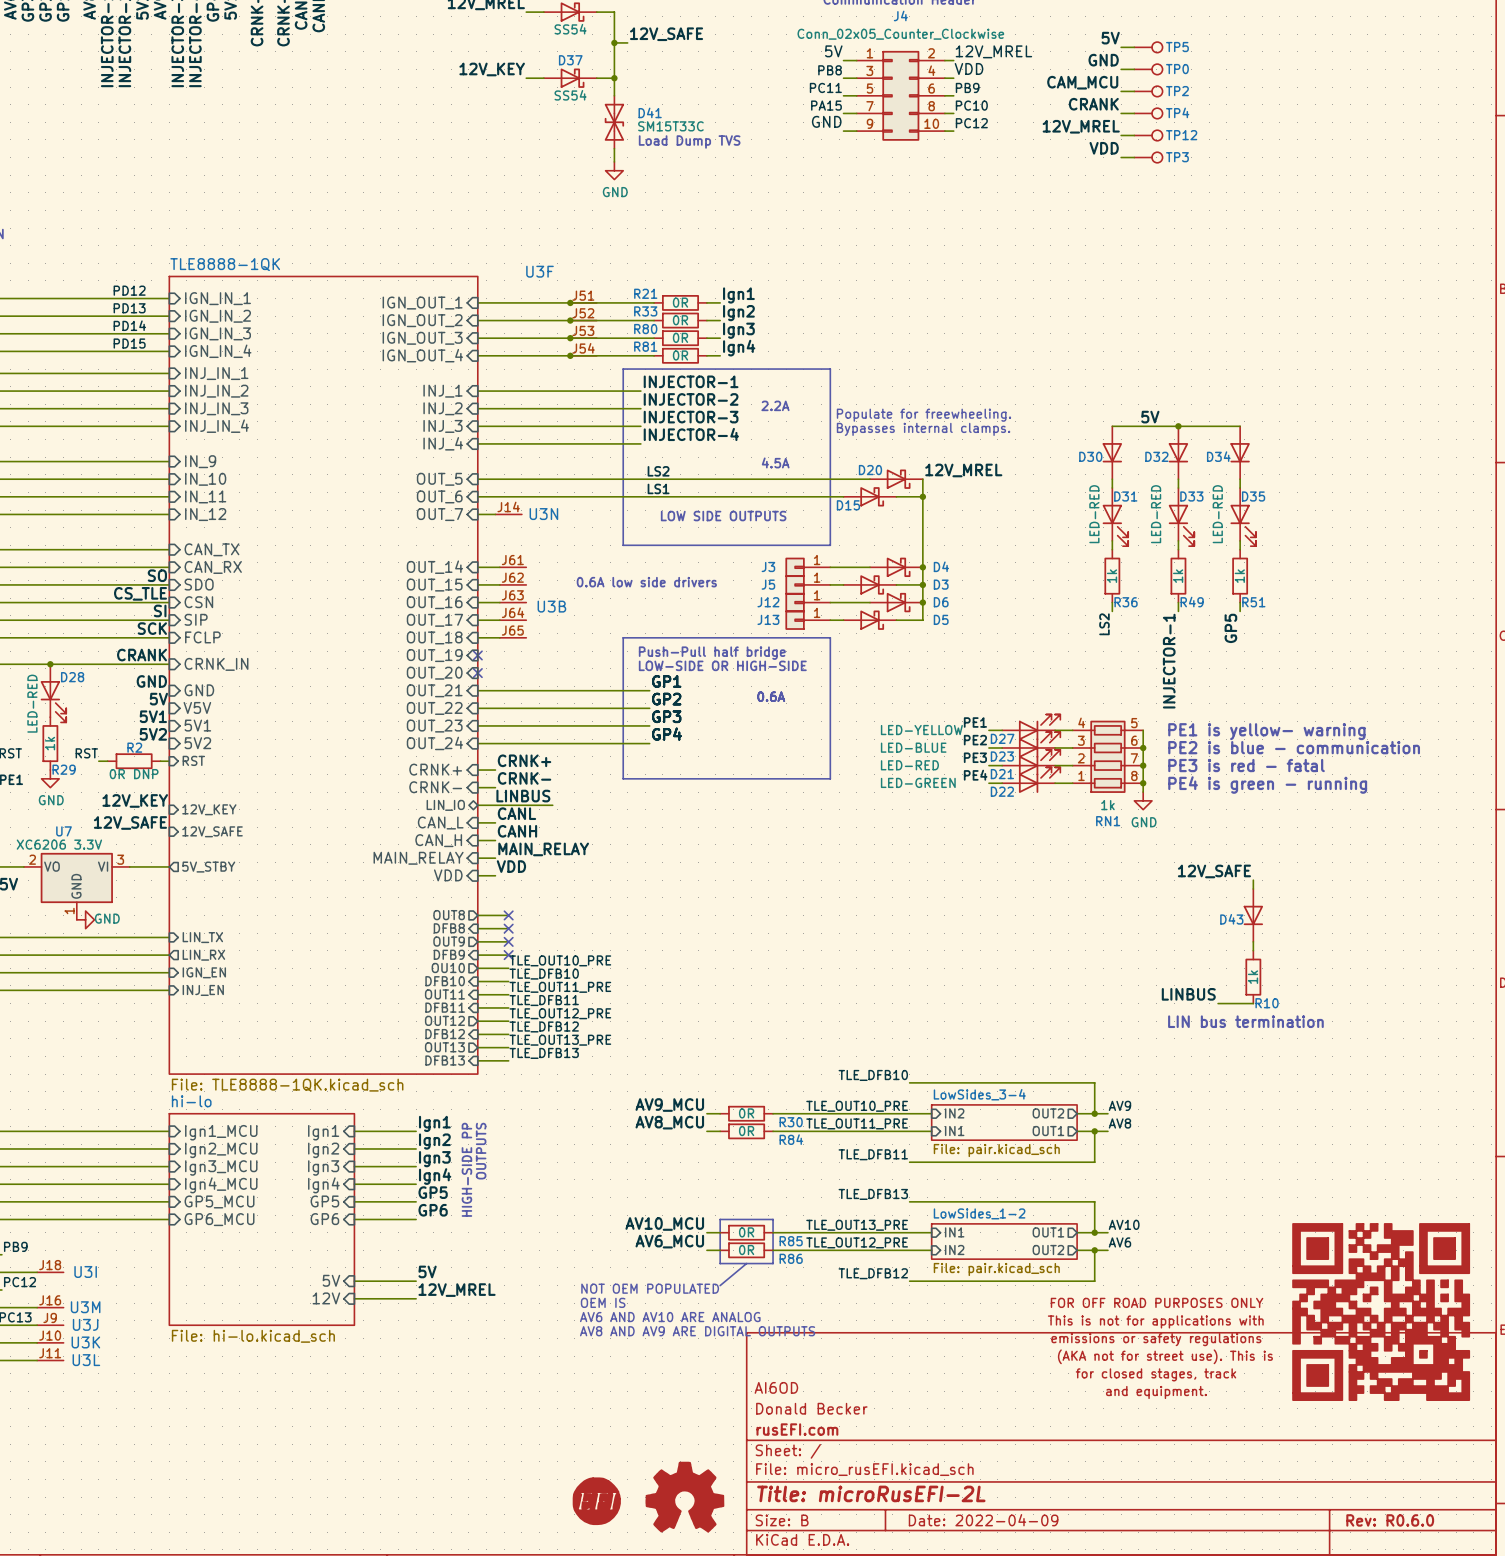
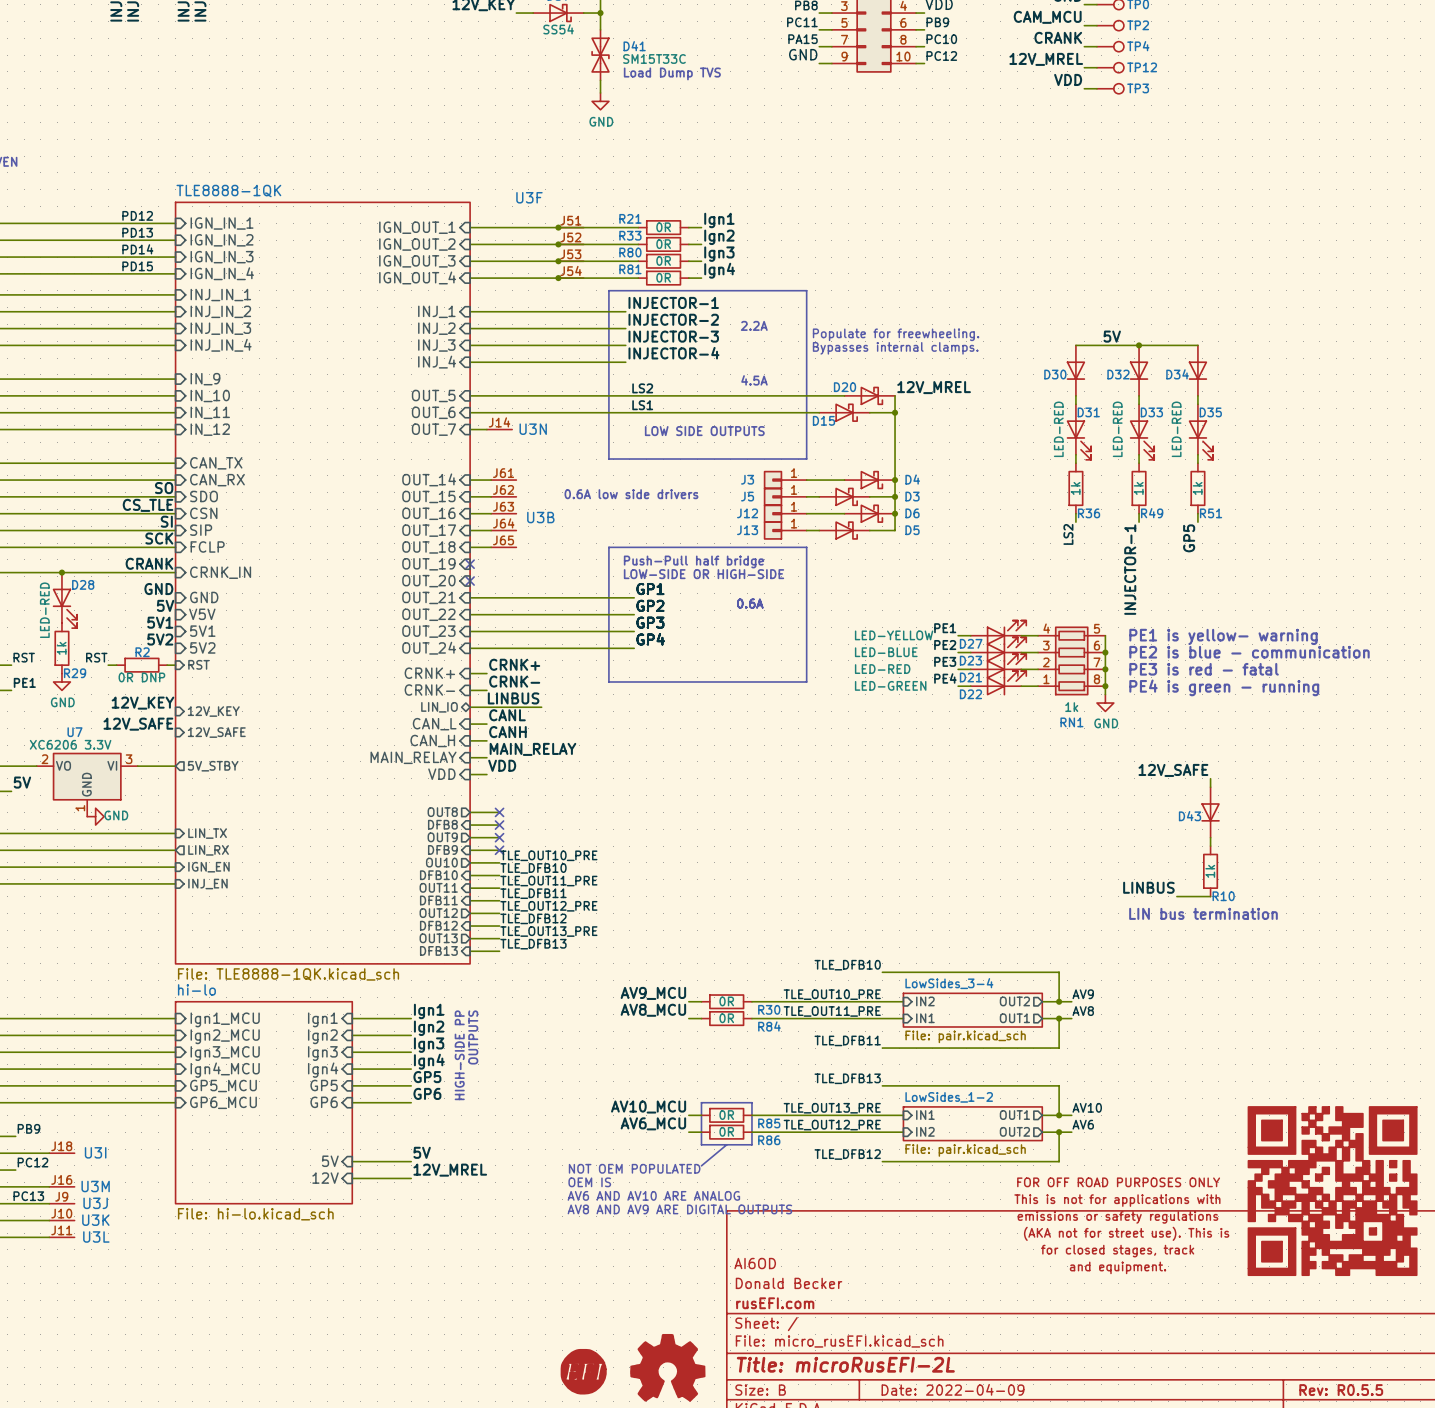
title block: Rev: R0.6.0 (1390, 1520) -> Rev: R0.5.5 (1341, 1390)

